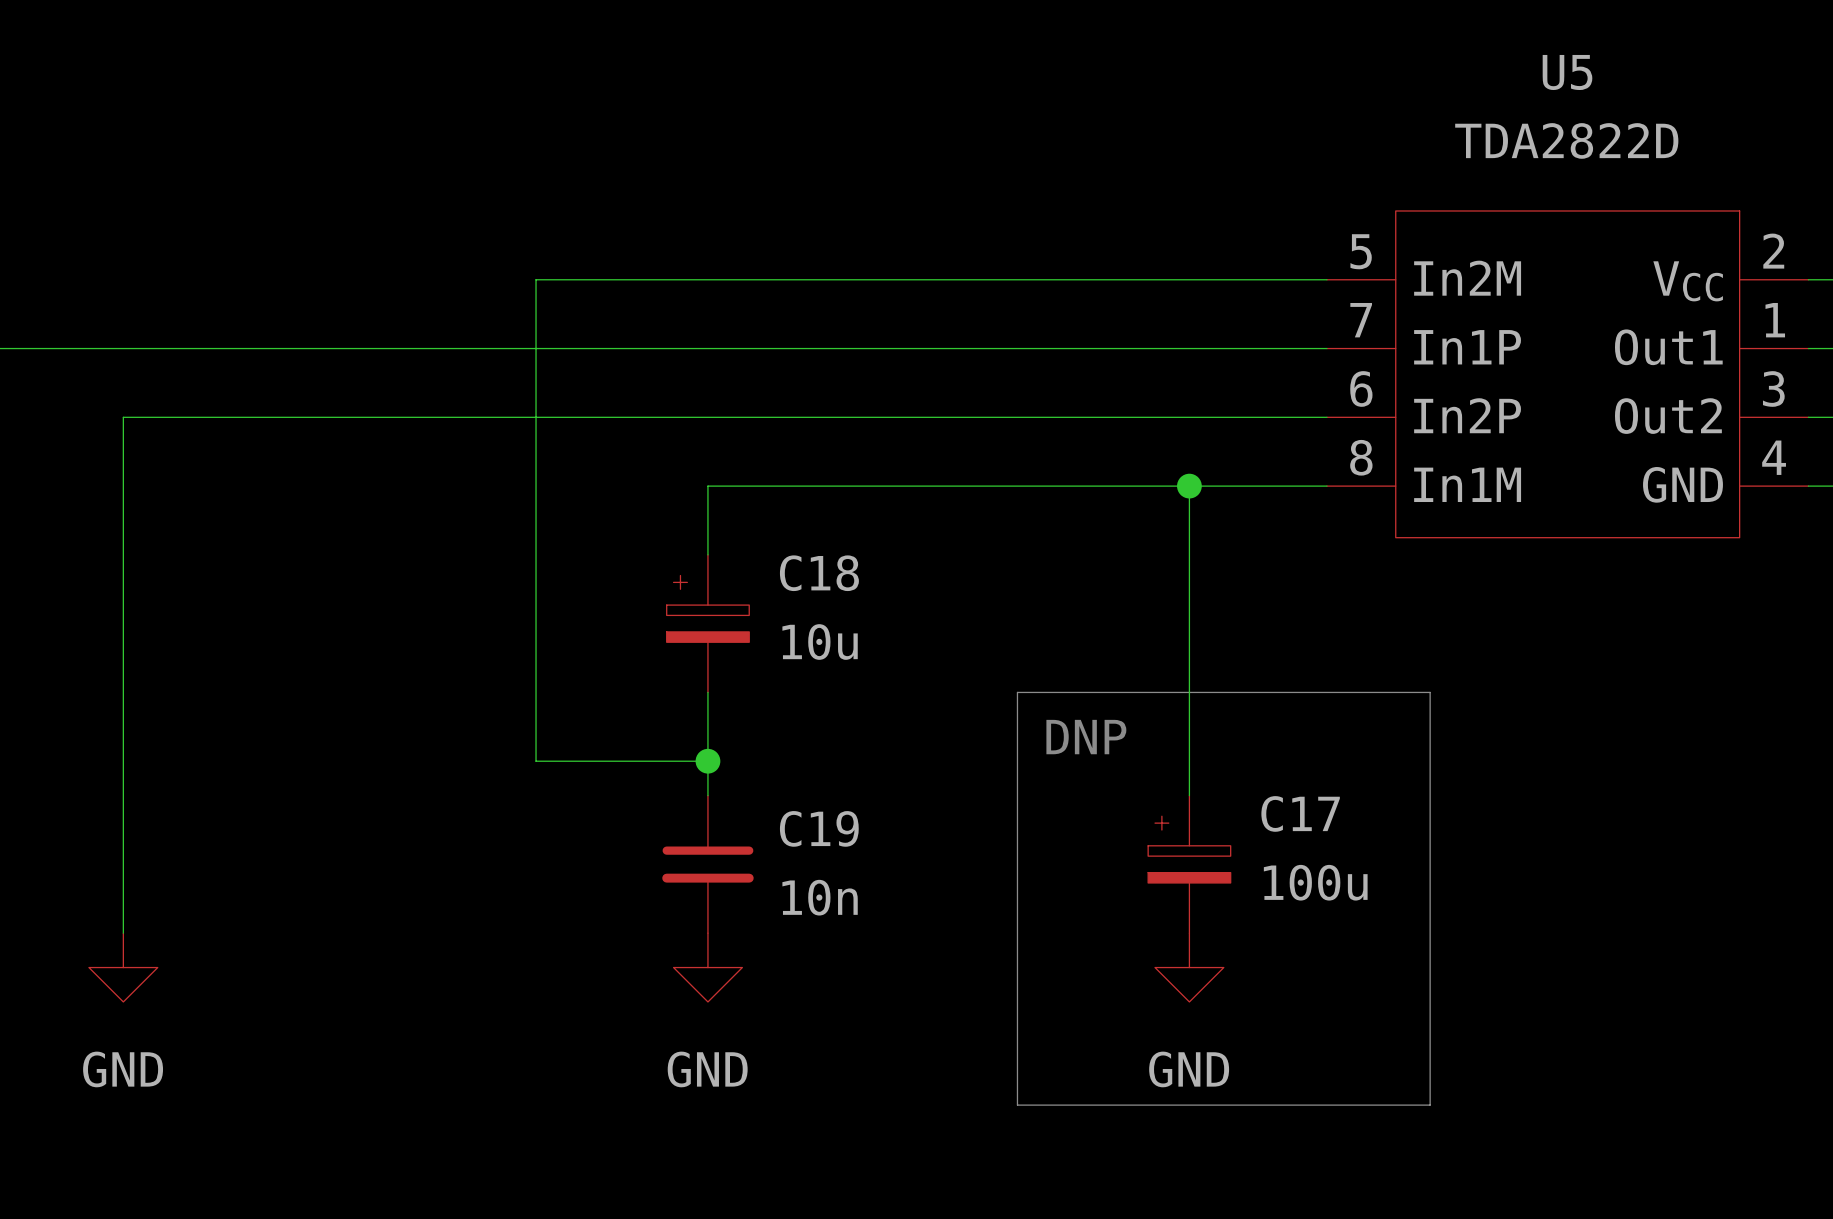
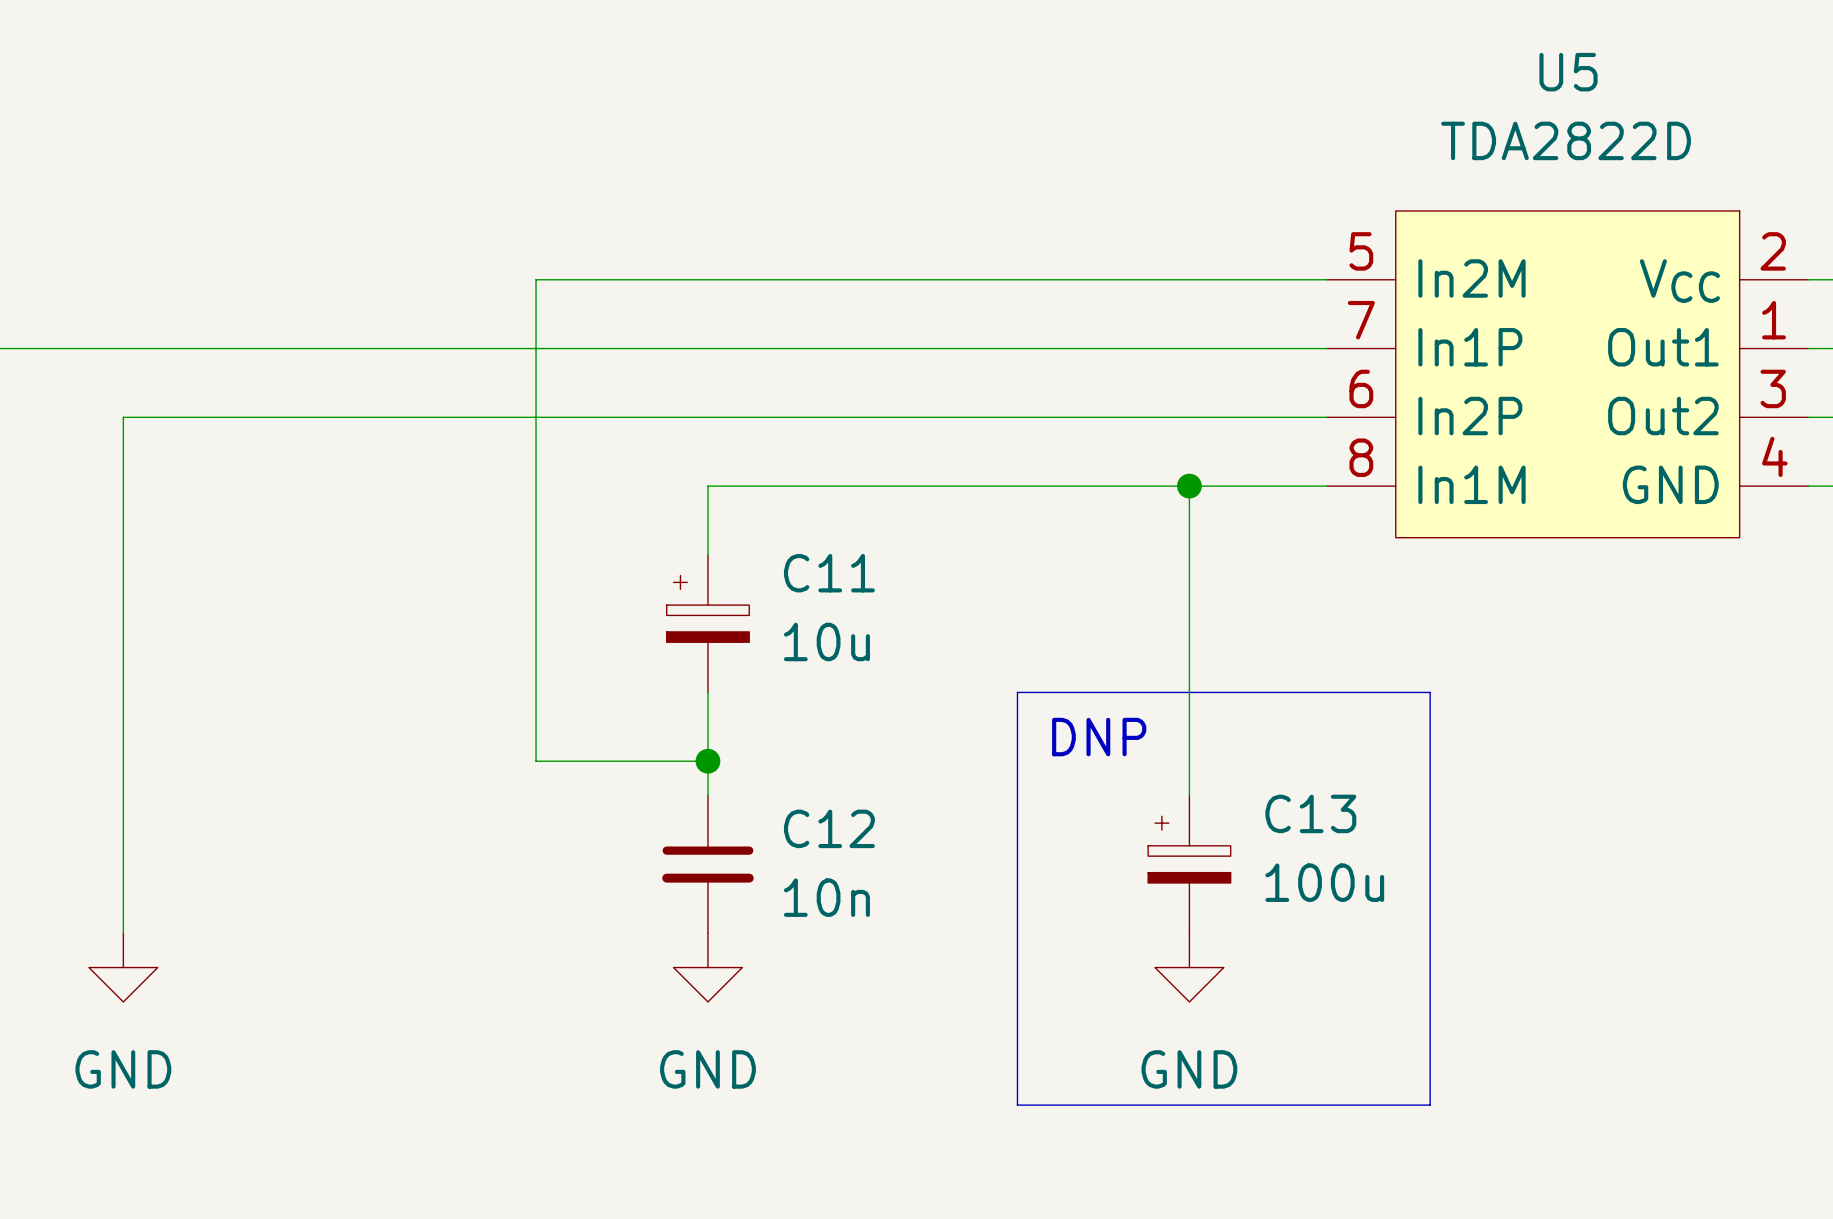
C18 name: C18 (819, 573) -> C11 (829, 573)
C17 name: C17 (1300, 813) -> C13 (1310, 813)
C19 name: C19 (819, 828) -> C12 (829, 828)

